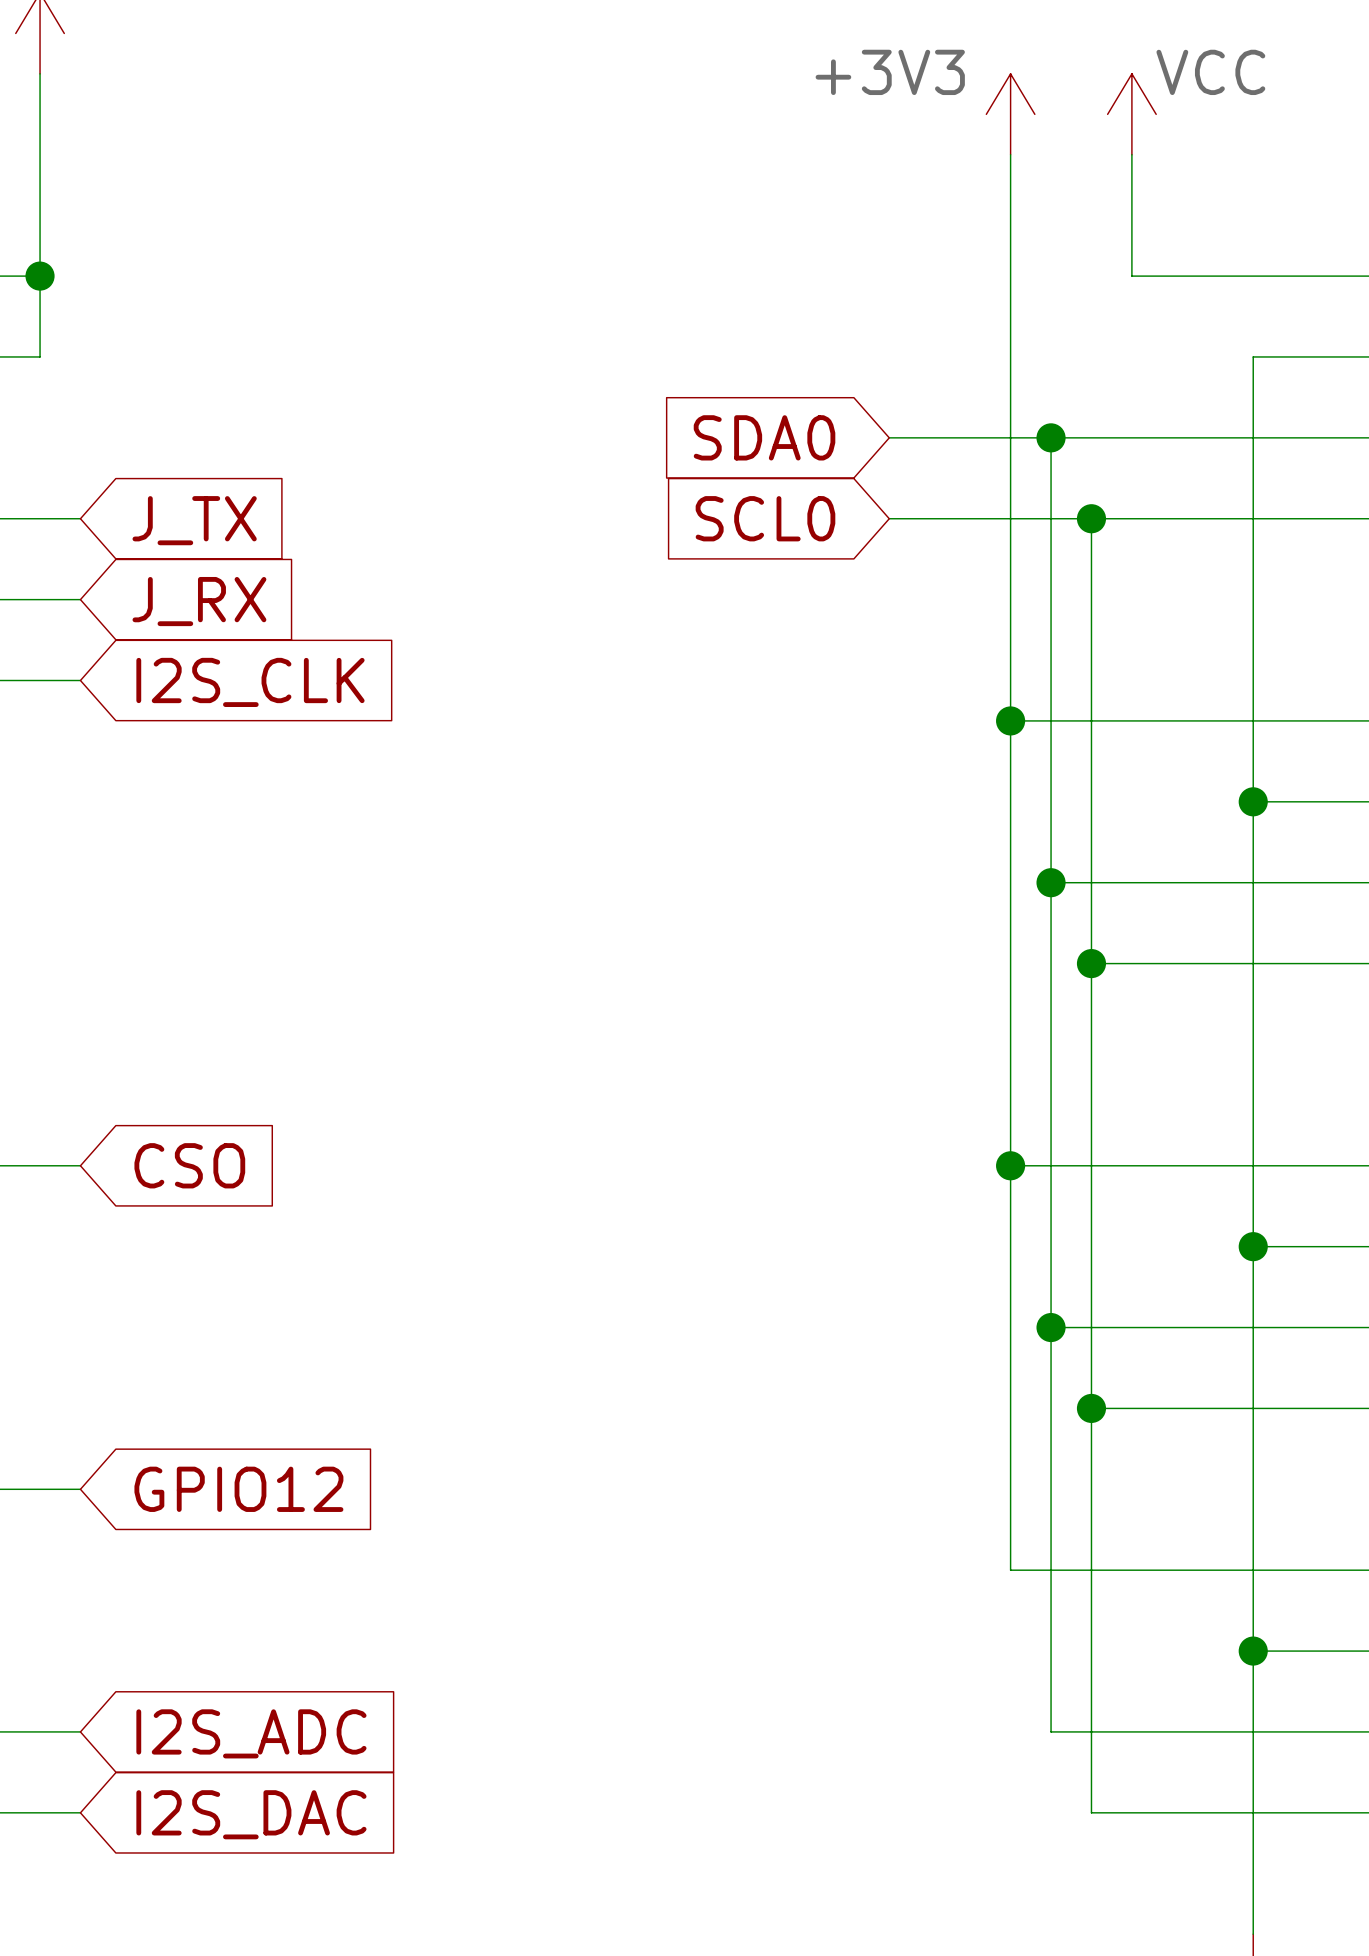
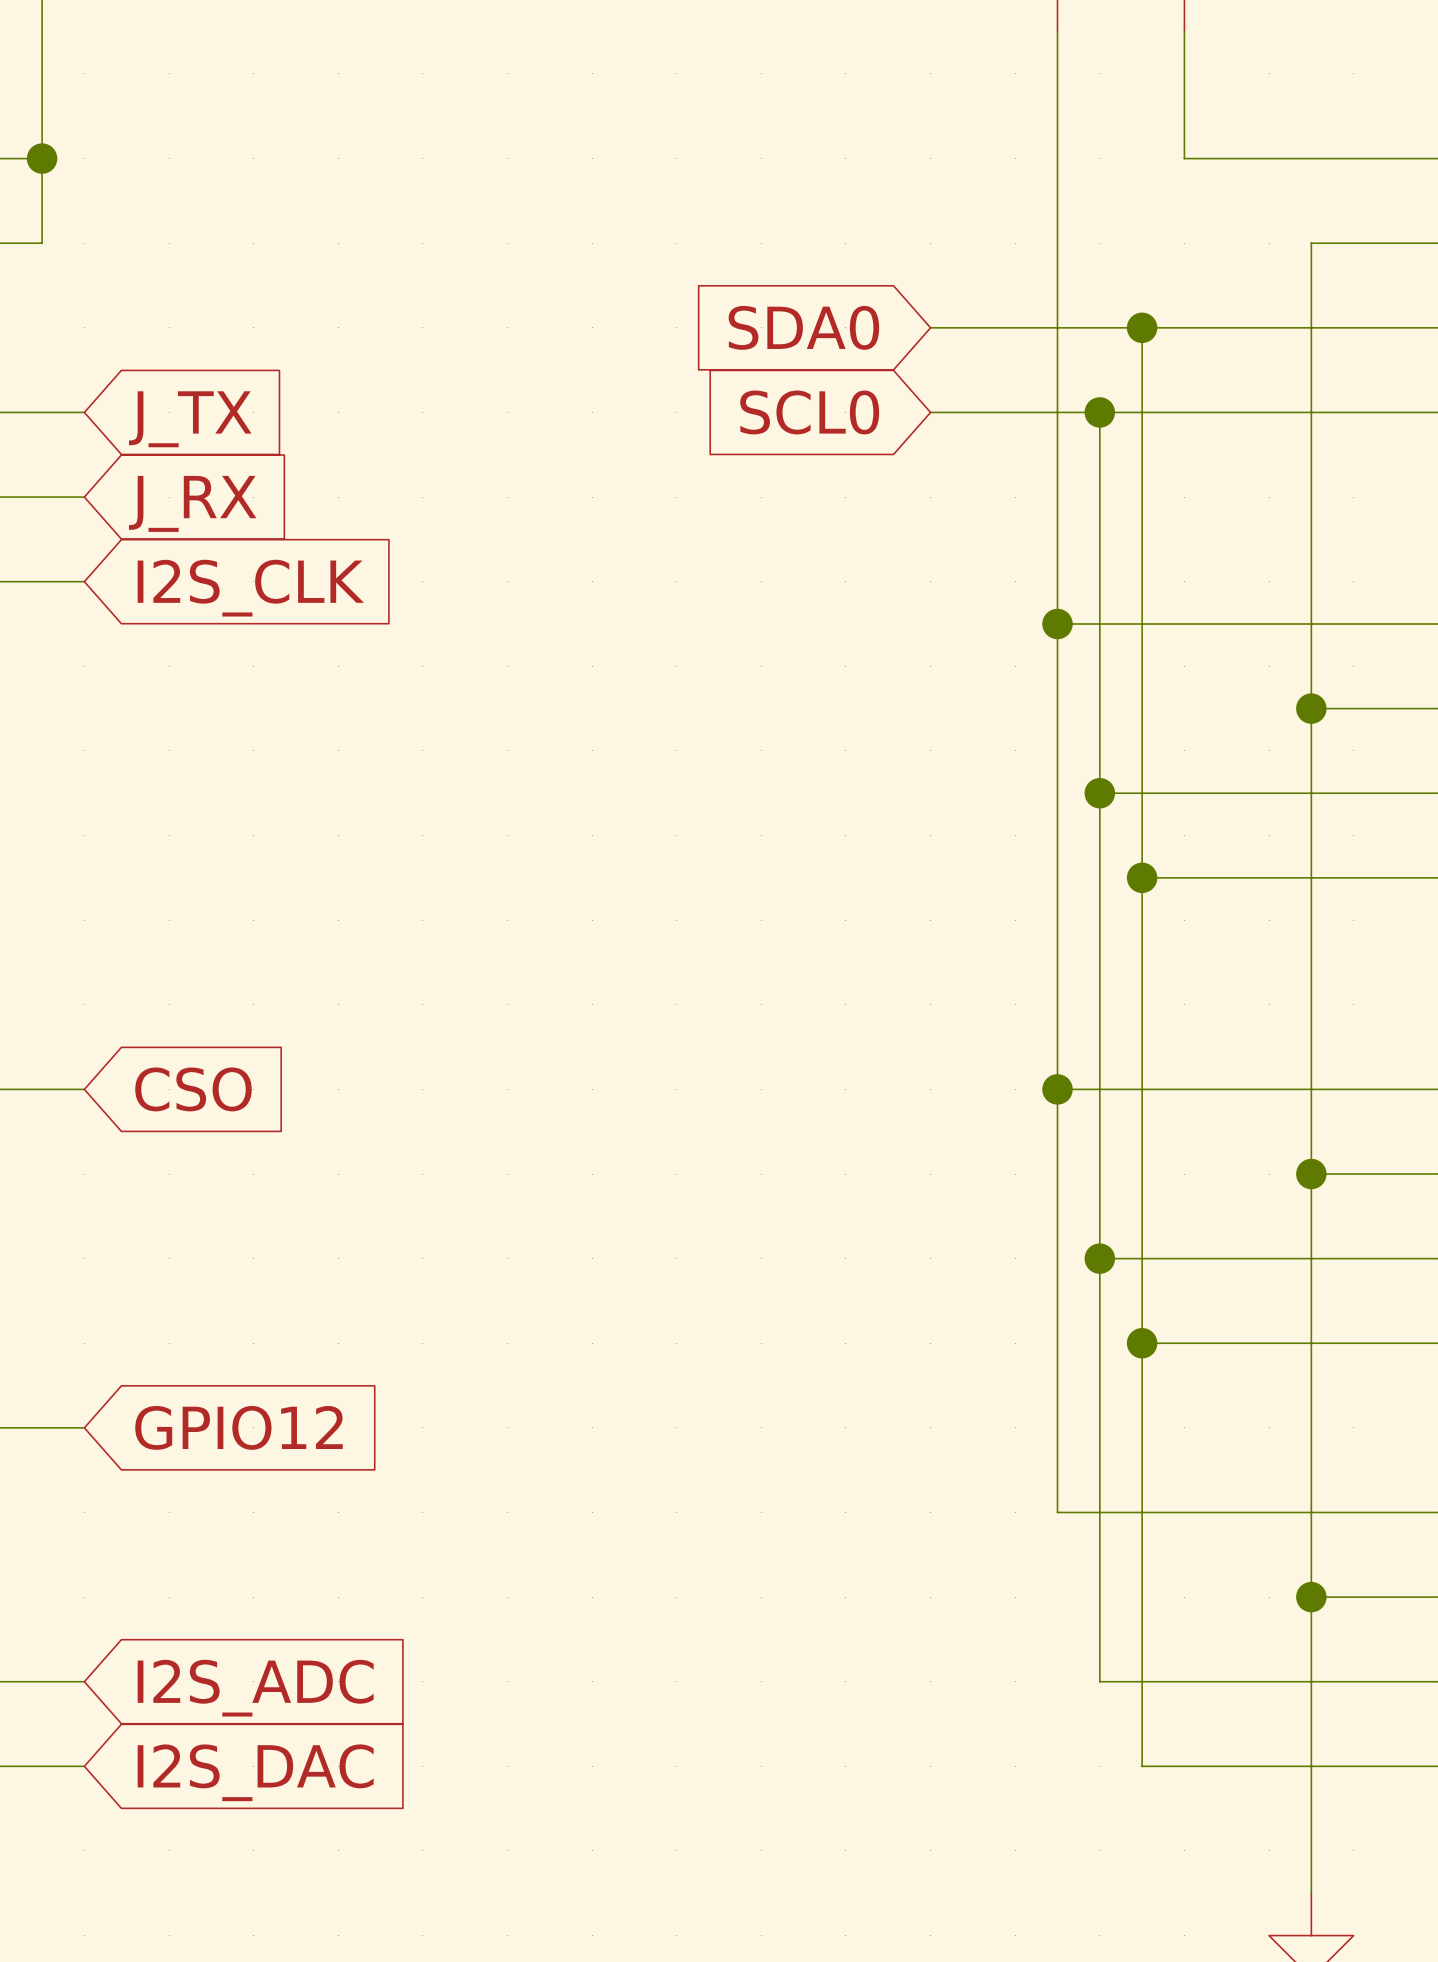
wire: (1051, 437) (1051, 518) -> (1142, 327) (1142, 412)
junction: (1051, 437) -> none
junction: none -> (1142, 327)
junction: none -> (1099, 412)
junction: (1091, 518) -> none

